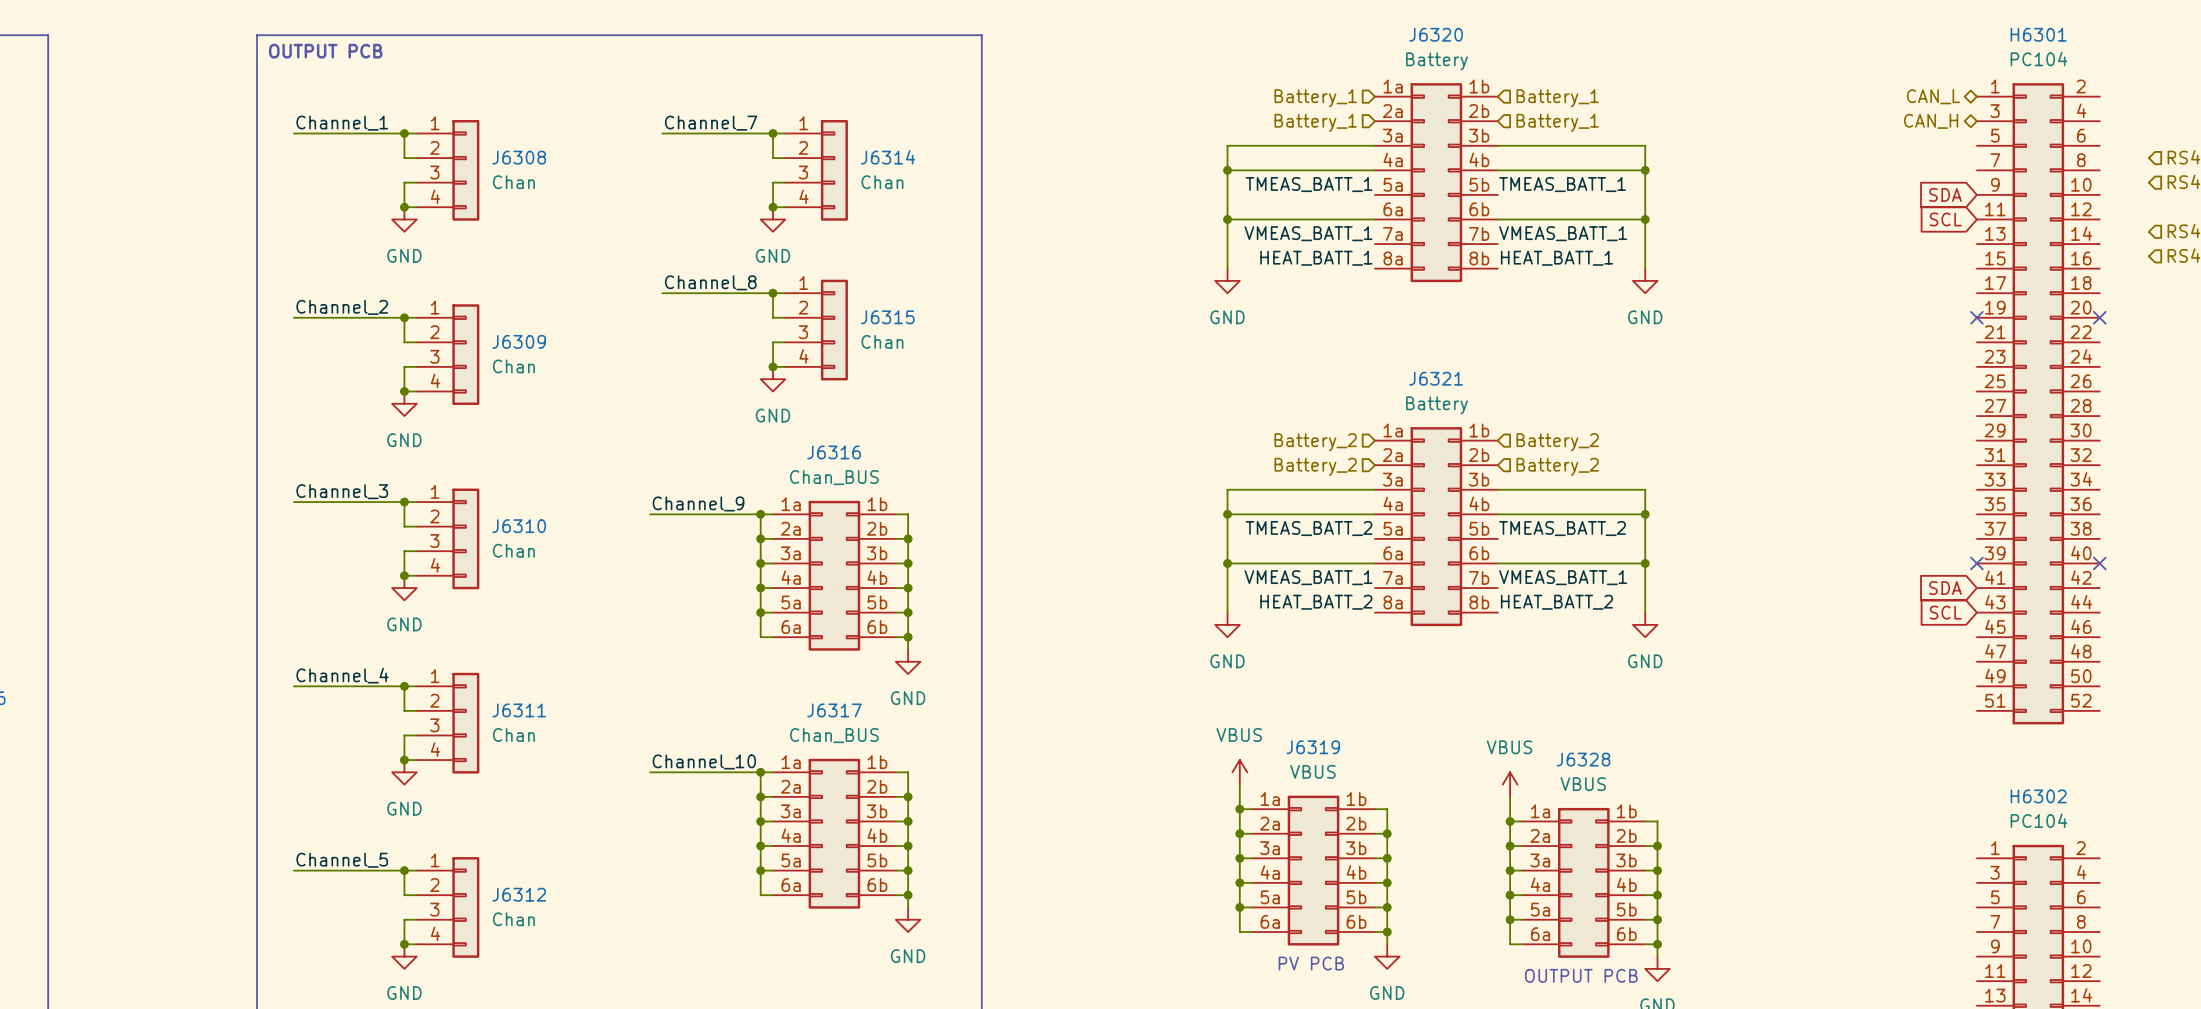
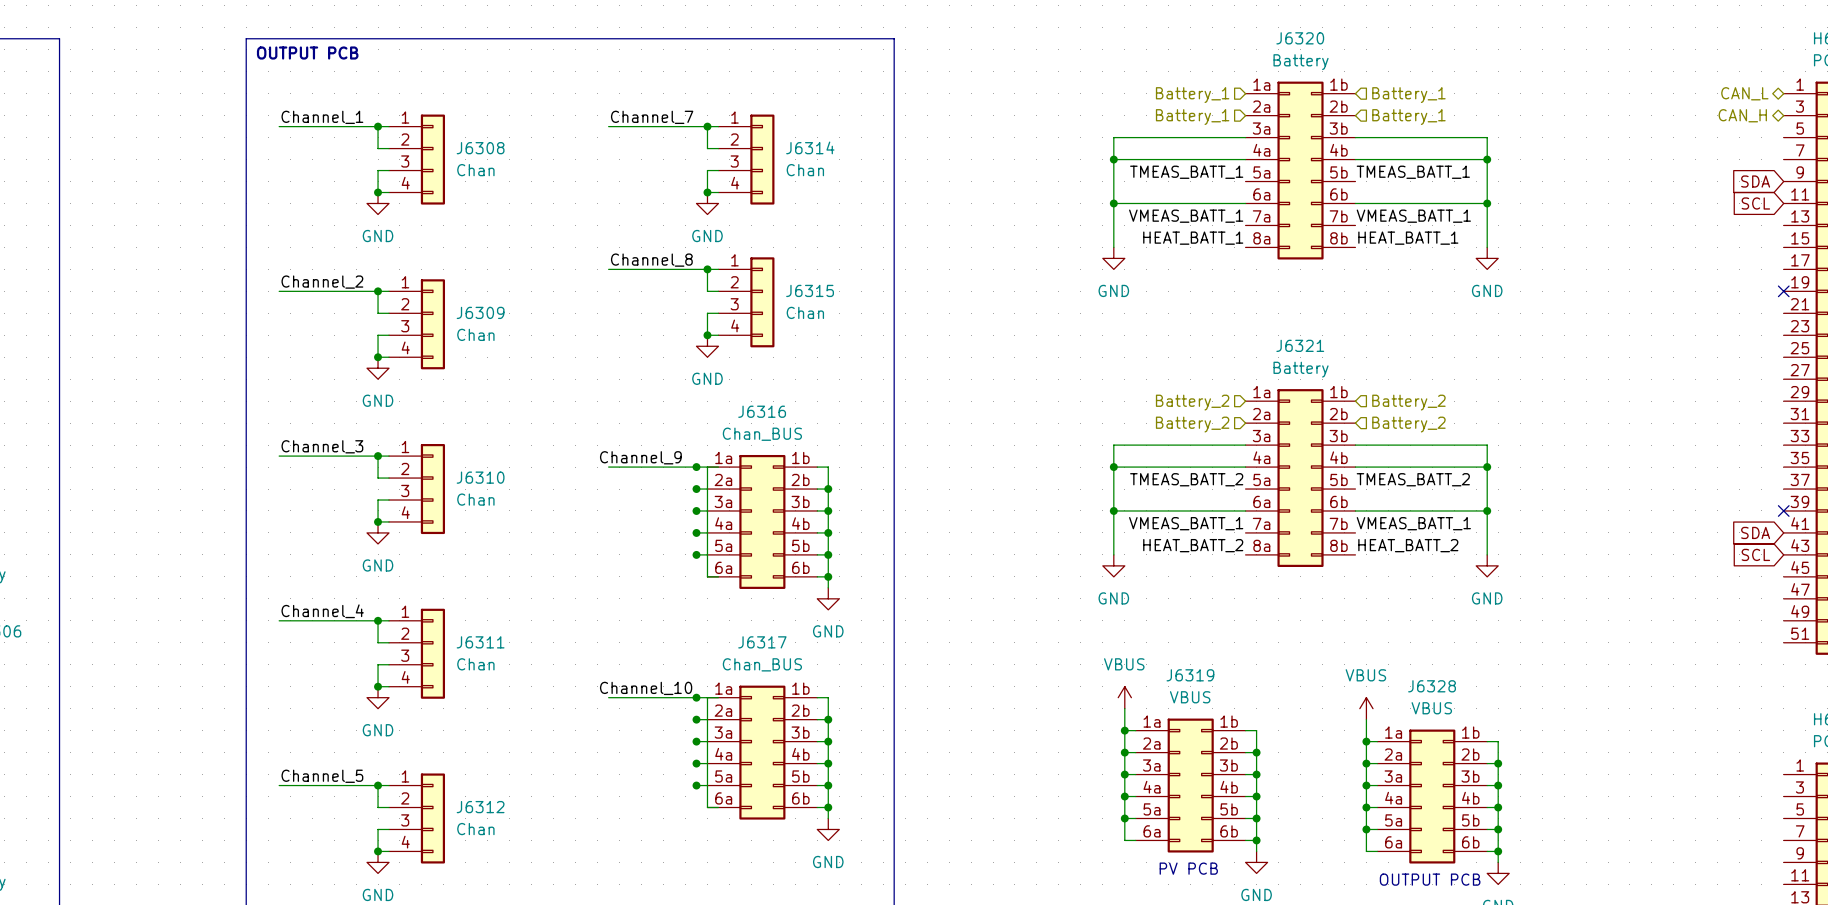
wire: (650, 514) (662, 514) -> none
wire: (760, 514) (760, 637) (772, 637) -> none
wire: none -> (718, 467) (707, 467) (707, 576) (718, 576)
wire: (650, 772) (662, 772) -> none
wire: (760, 772) (760, 895) (772, 895) -> none
wire: none -> (718, 697) (707, 697) (707, 807) (718, 807)

